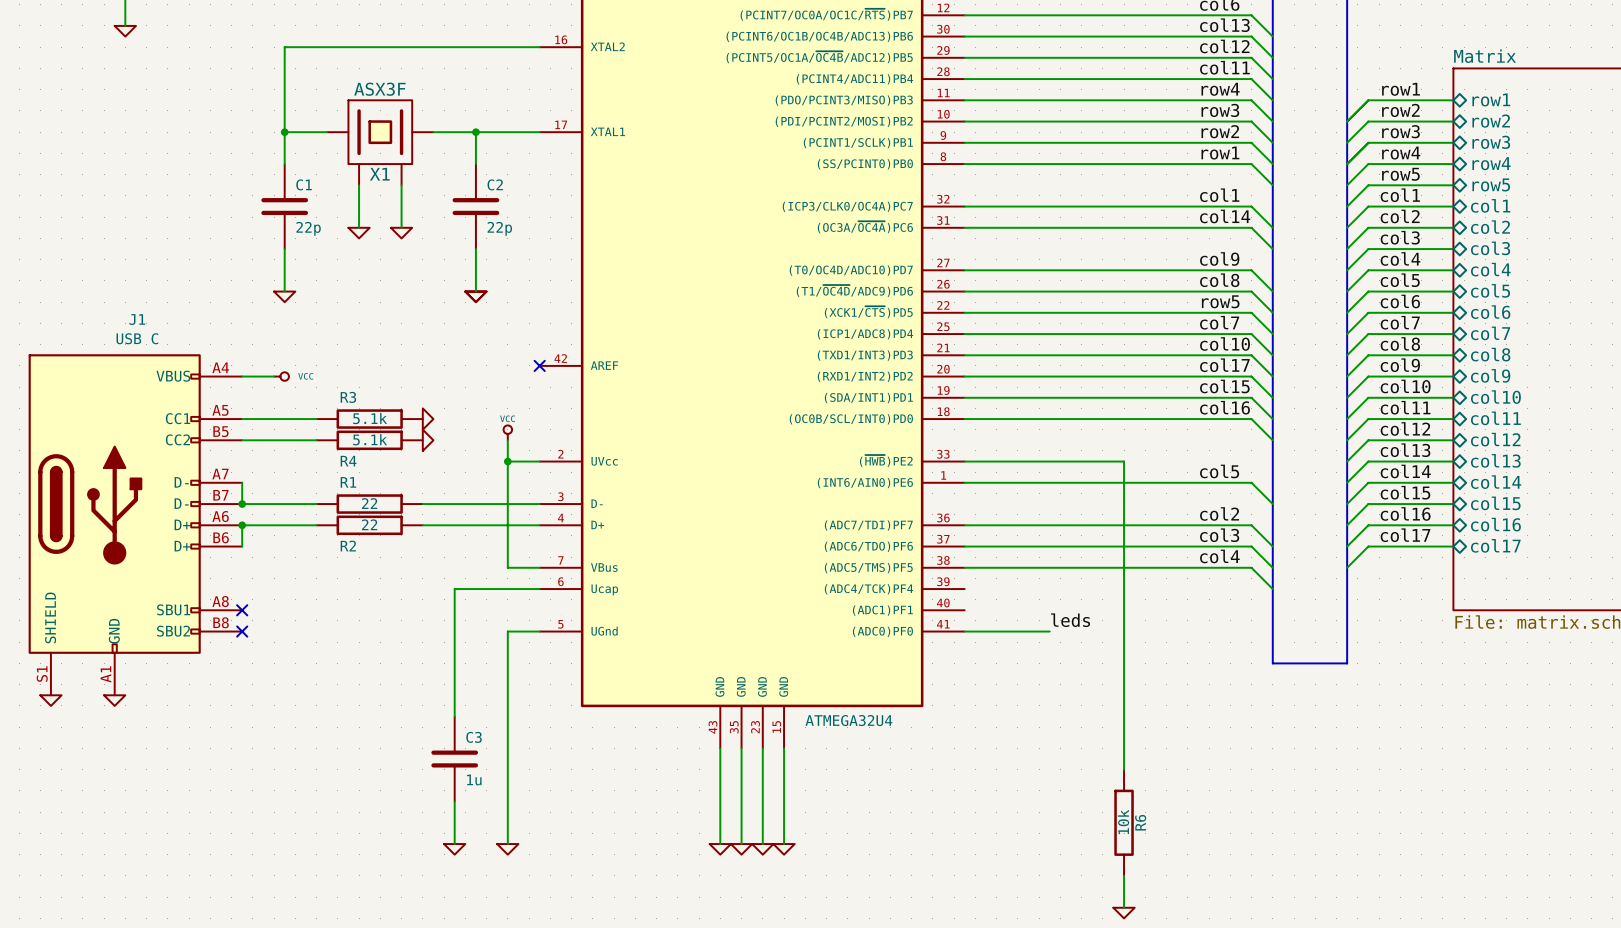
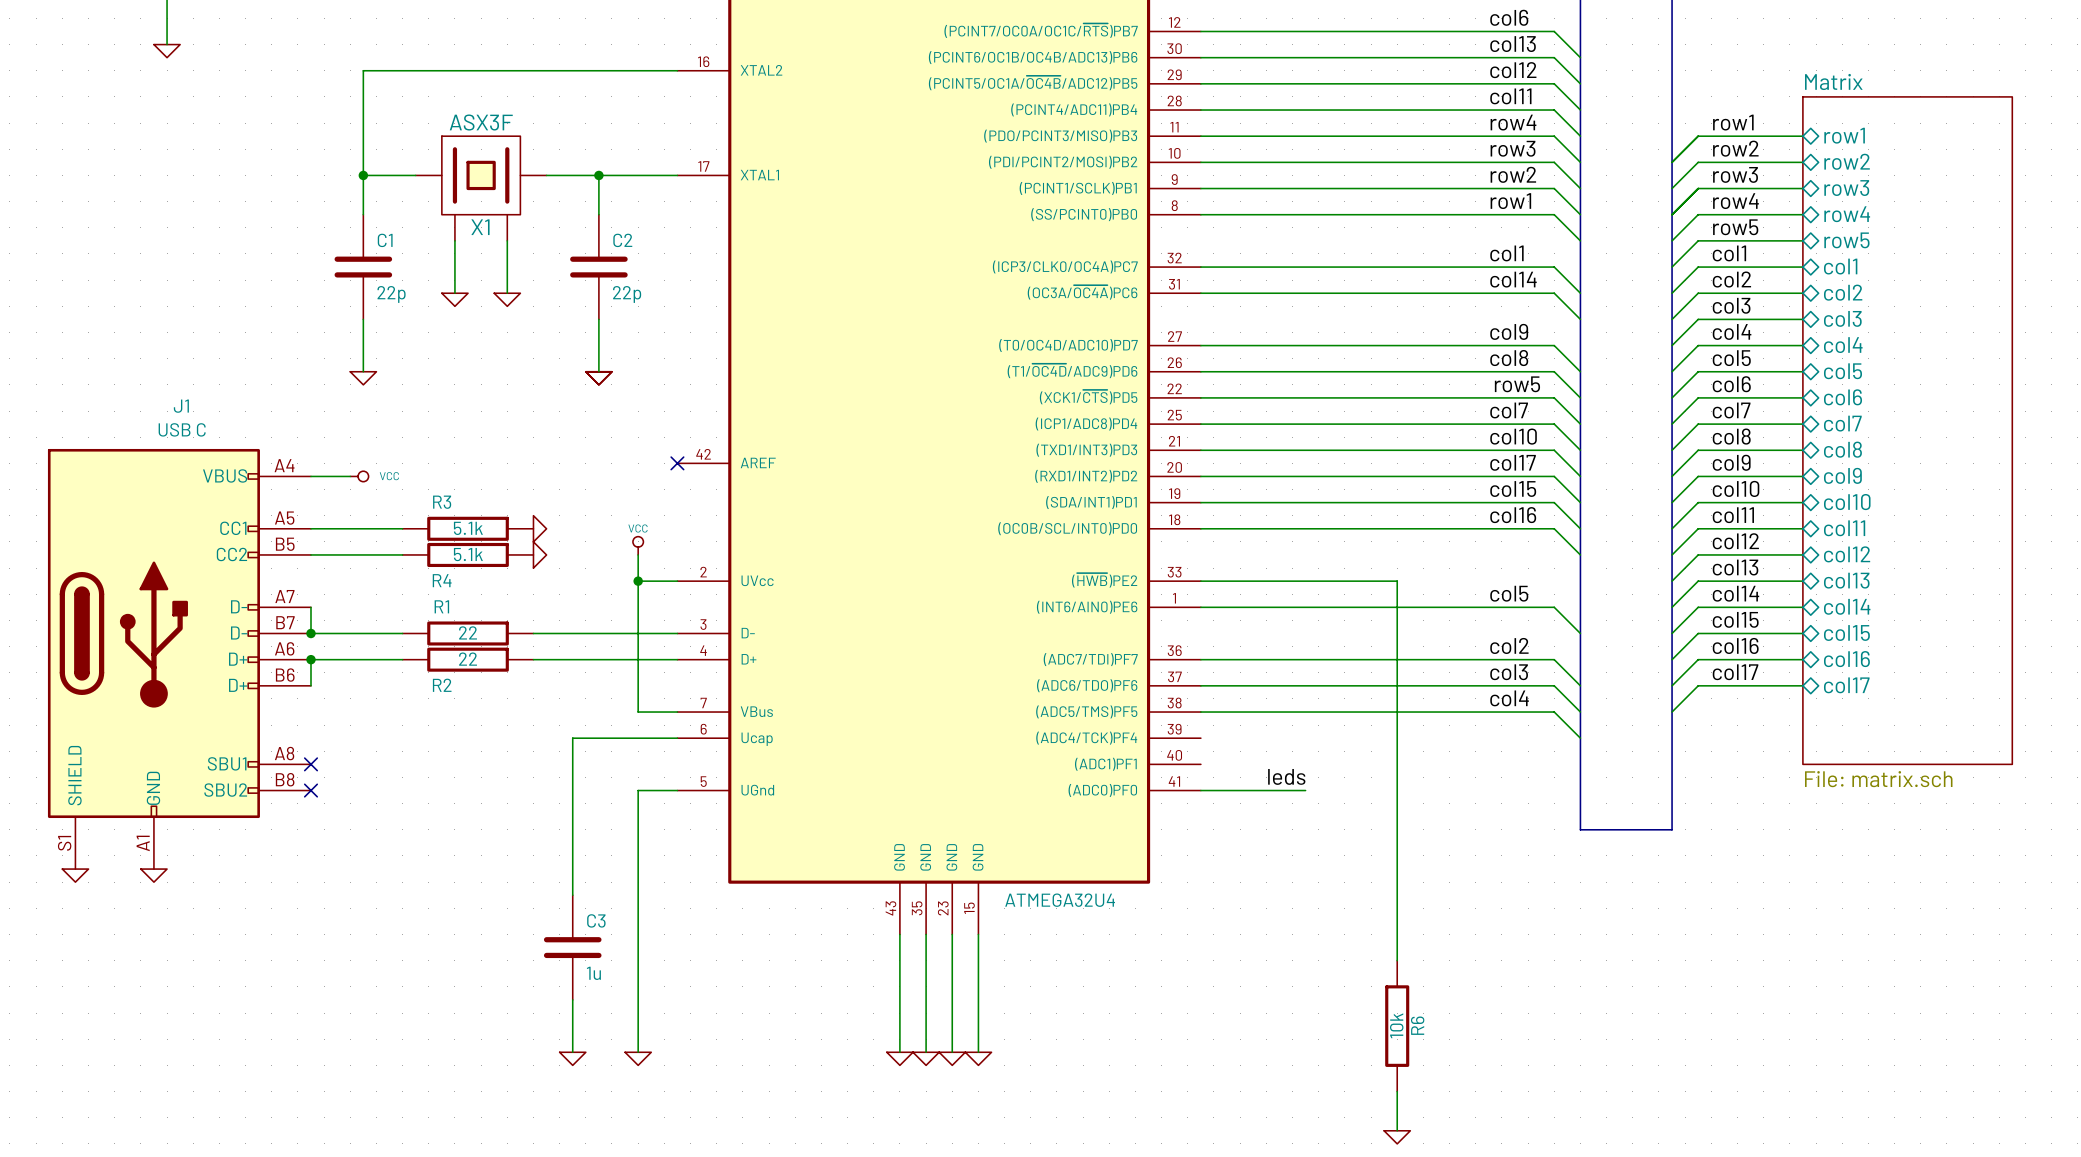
label position: leds (1070, 620) -> leds (1286, 776)

